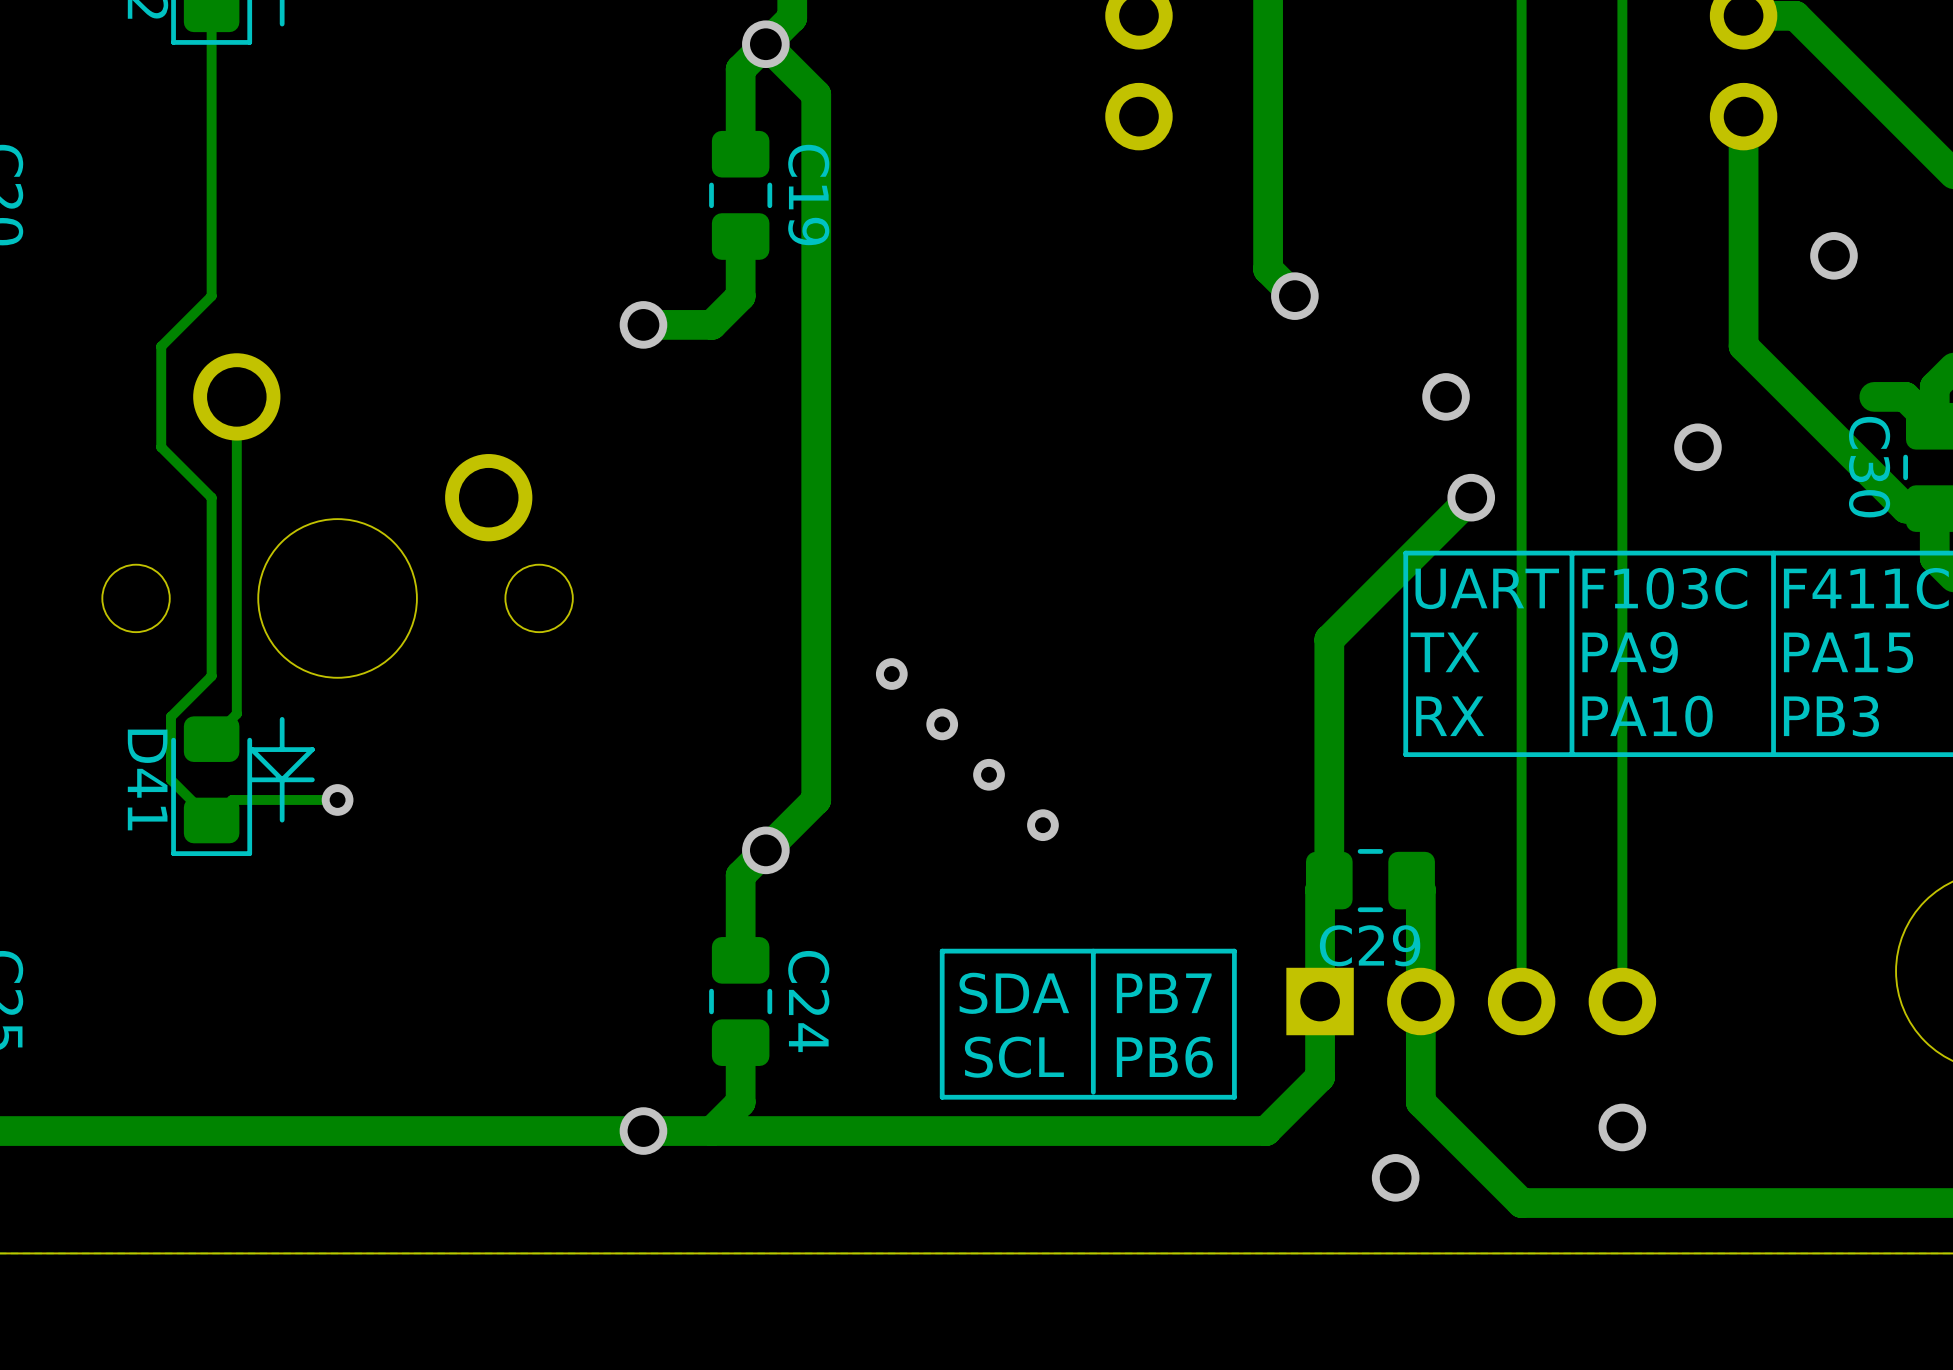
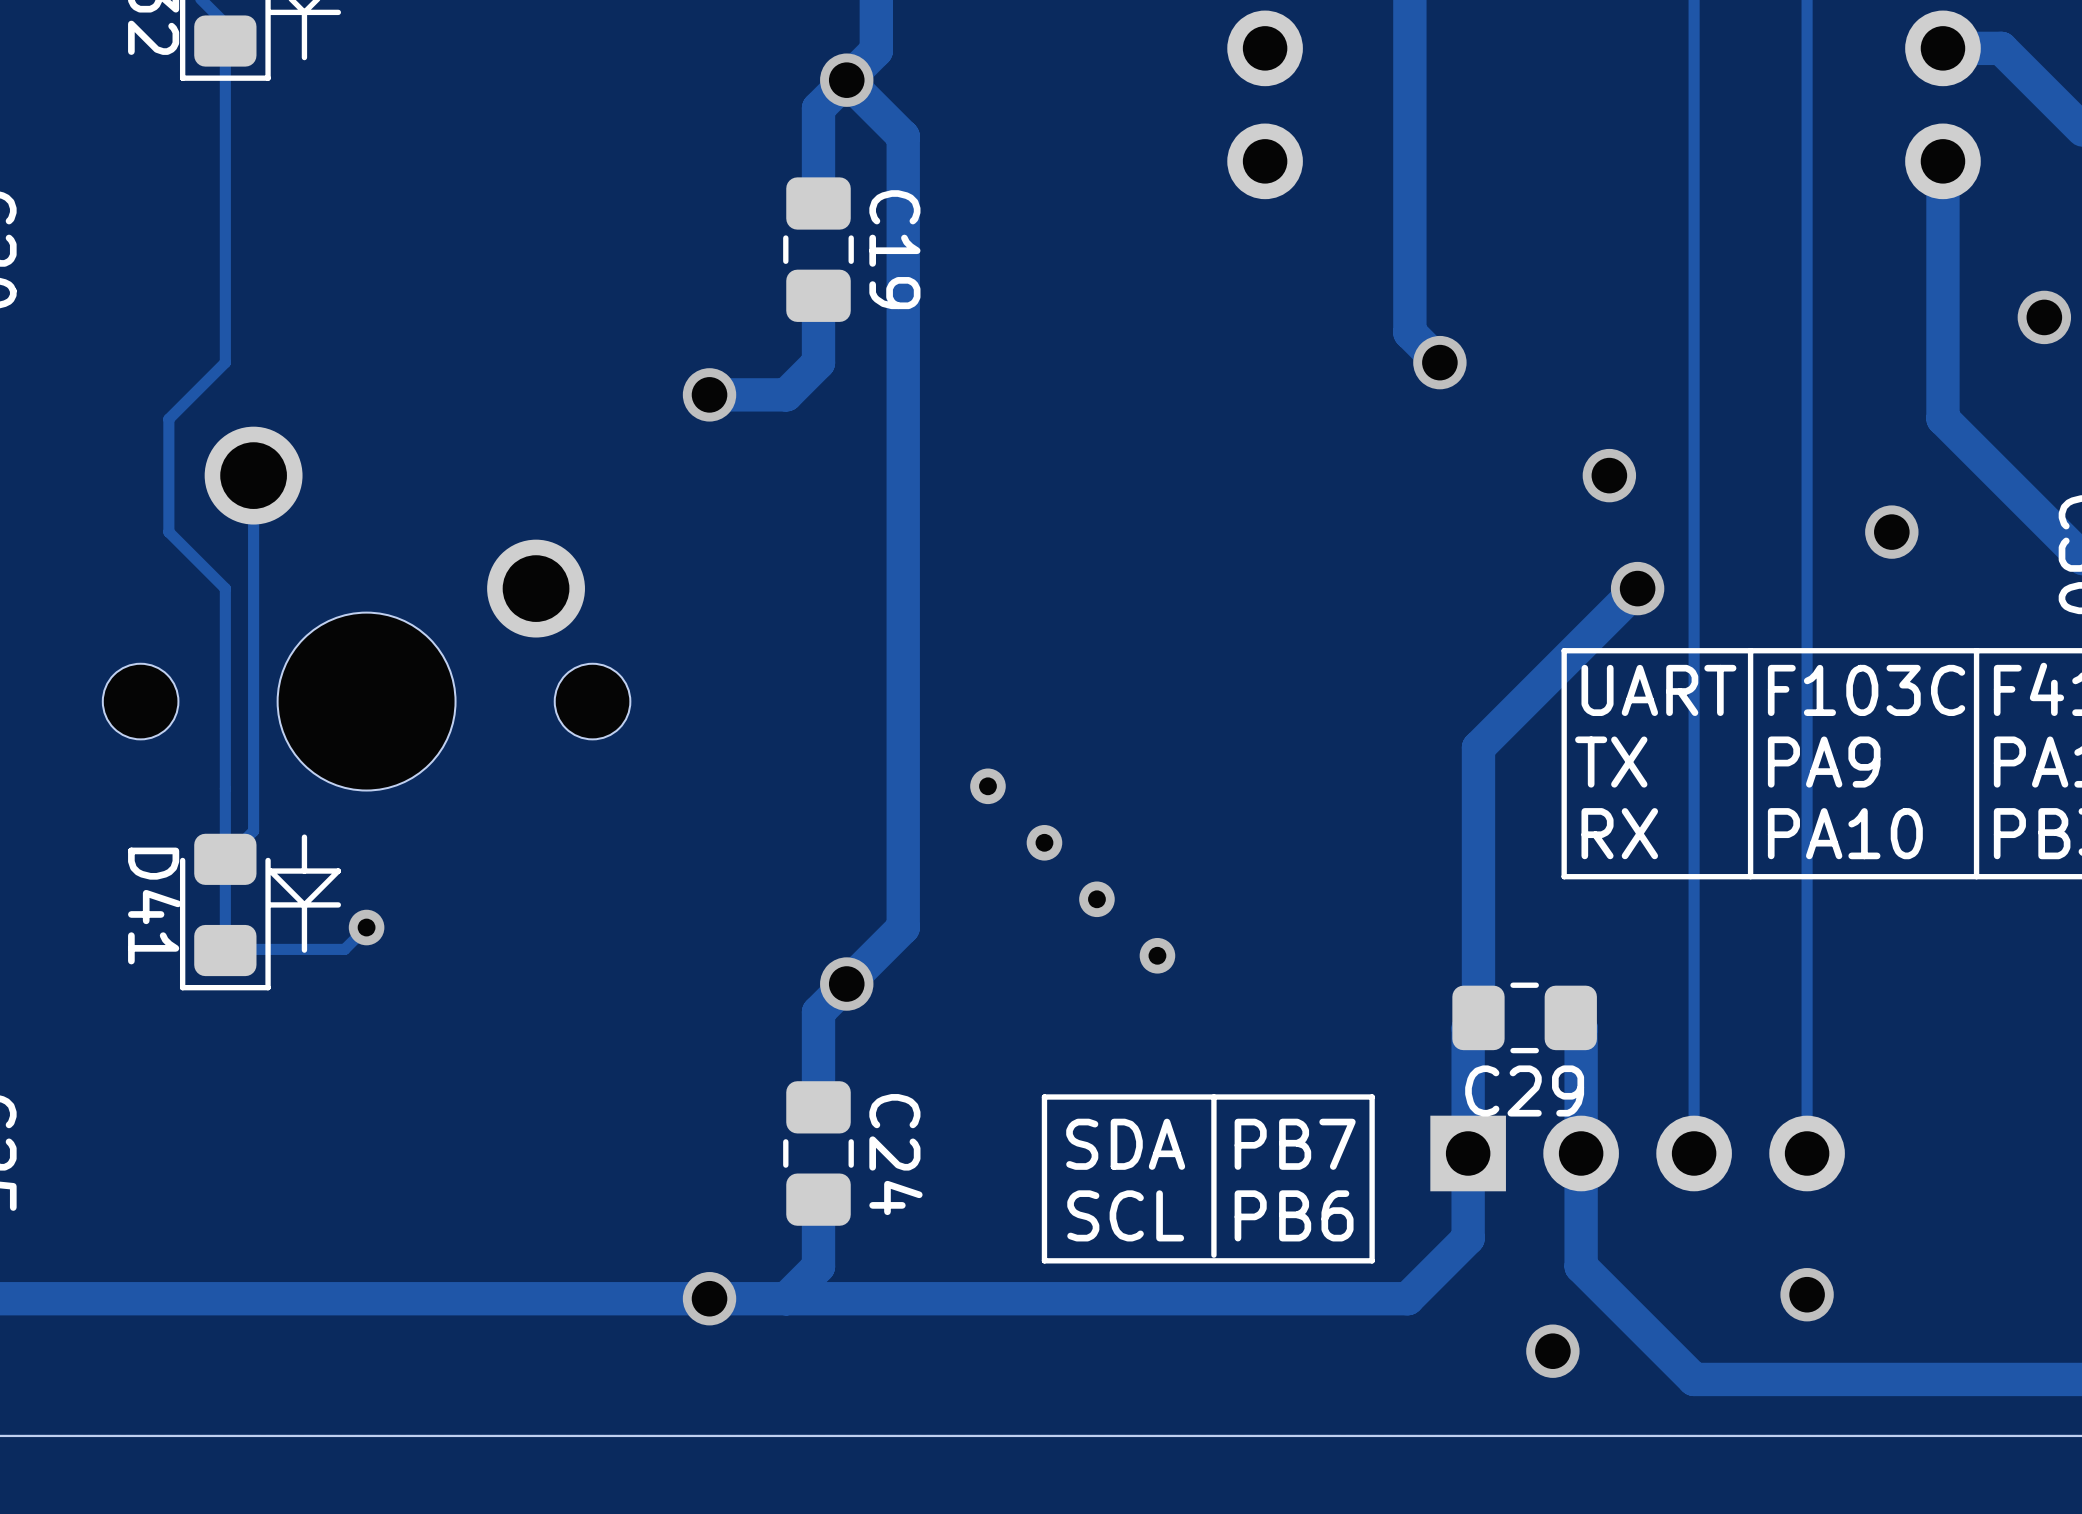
track: (211, 676) (170, 716) (170, 779) (211, 820) (232, 799) (337, 799) -> (225, 788) (225, 949) (344, 949) (366, 927)

